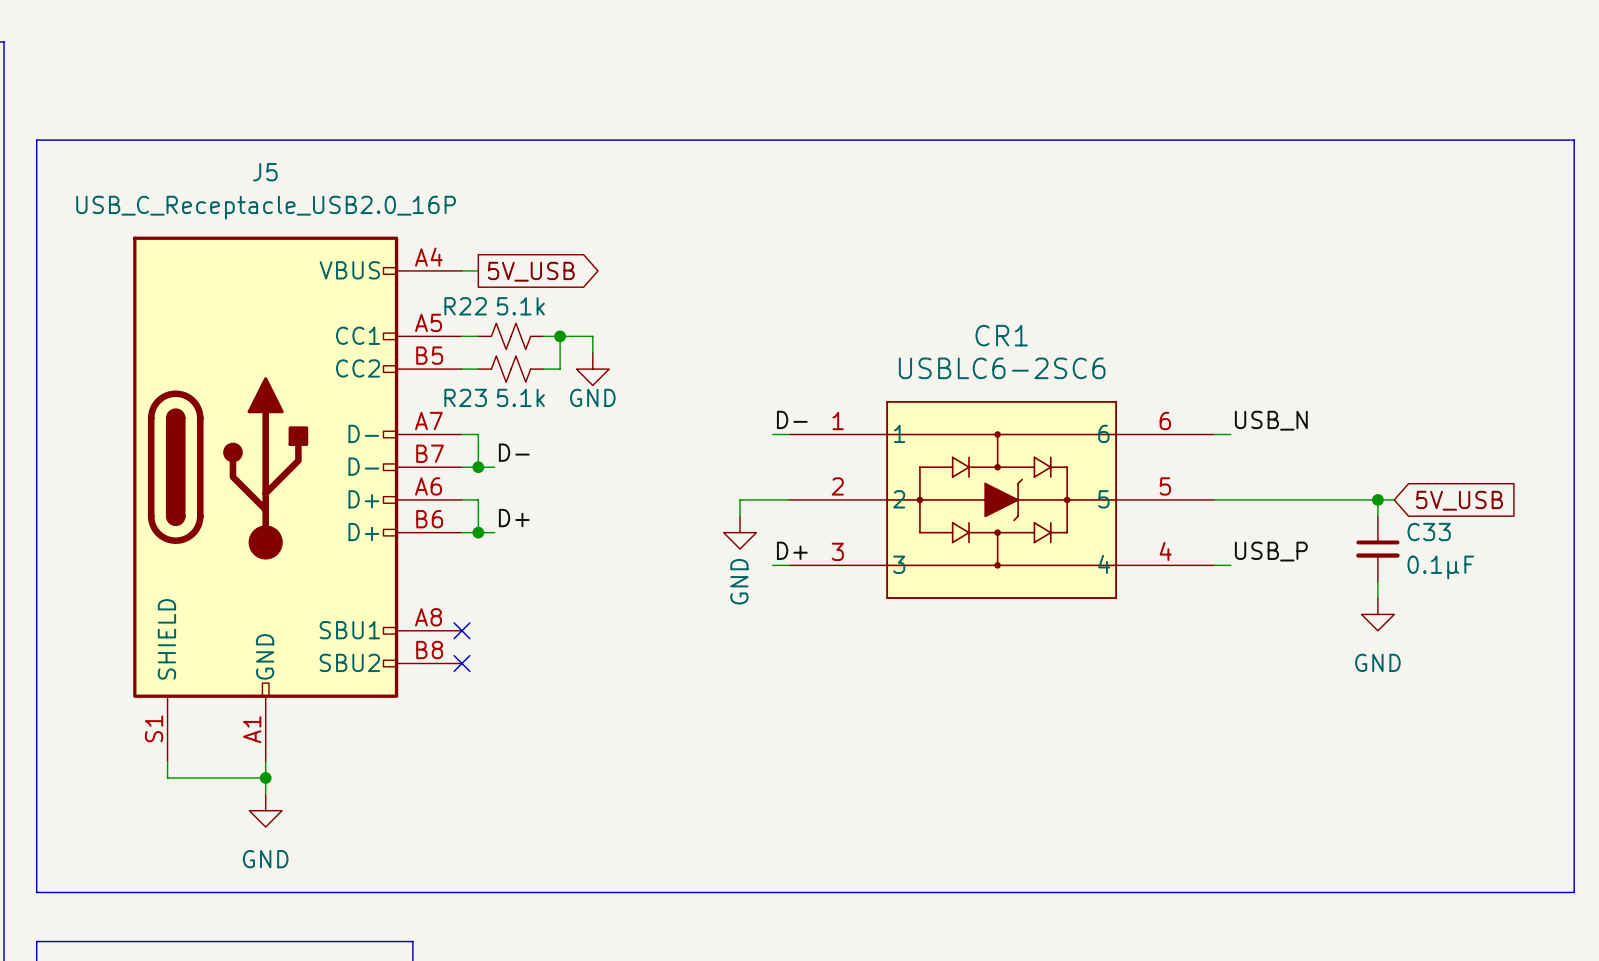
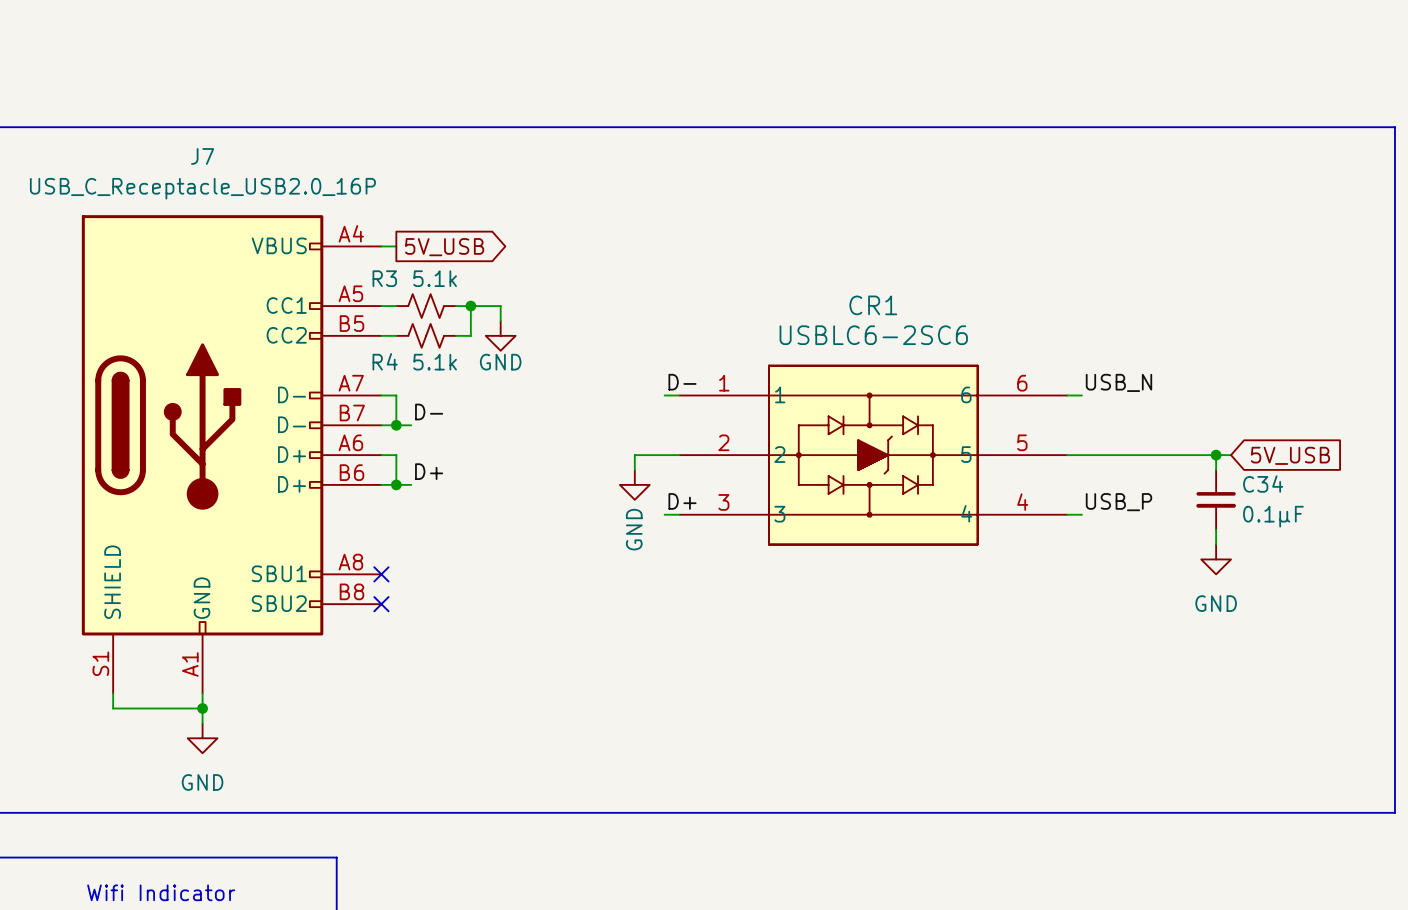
J5 name: J5 (265, 172) -> J7 (202, 156)
R22 name: R22 (465, 306) -> R3 (384, 278)
R23 name: R23 (465, 397) -> R4 (385, 361)
C33 name: C33 (1429, 532) -> C34 (1263, 484)

